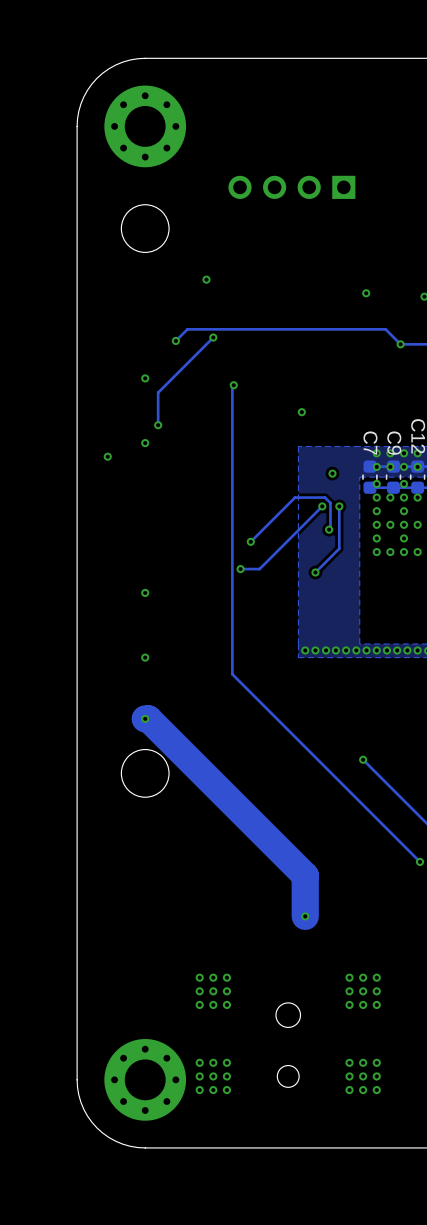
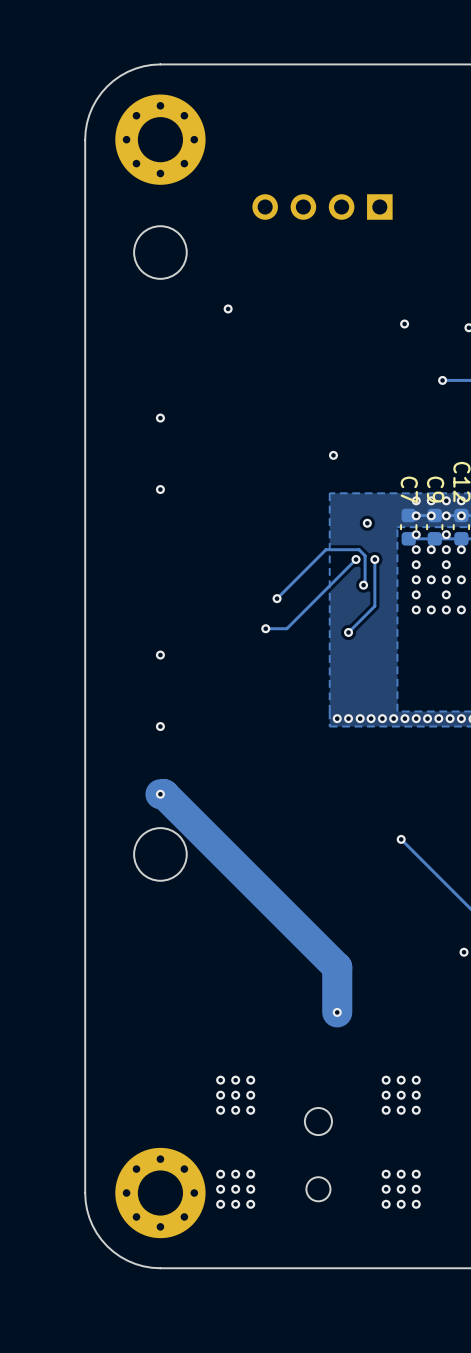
track: (213, 337) (158, 392) (158, 425) -> none
via: (213, 337) -> none
track: (175, 340) (187, 329) (385, 329) (400, 344) -> none
via: (175, 340) -> none
track: (233, 385) (232, 674) (420, 861) -> none
via: (233, 385) -> none
via: (158, 425) -> none
via: (107, 456) -> none

